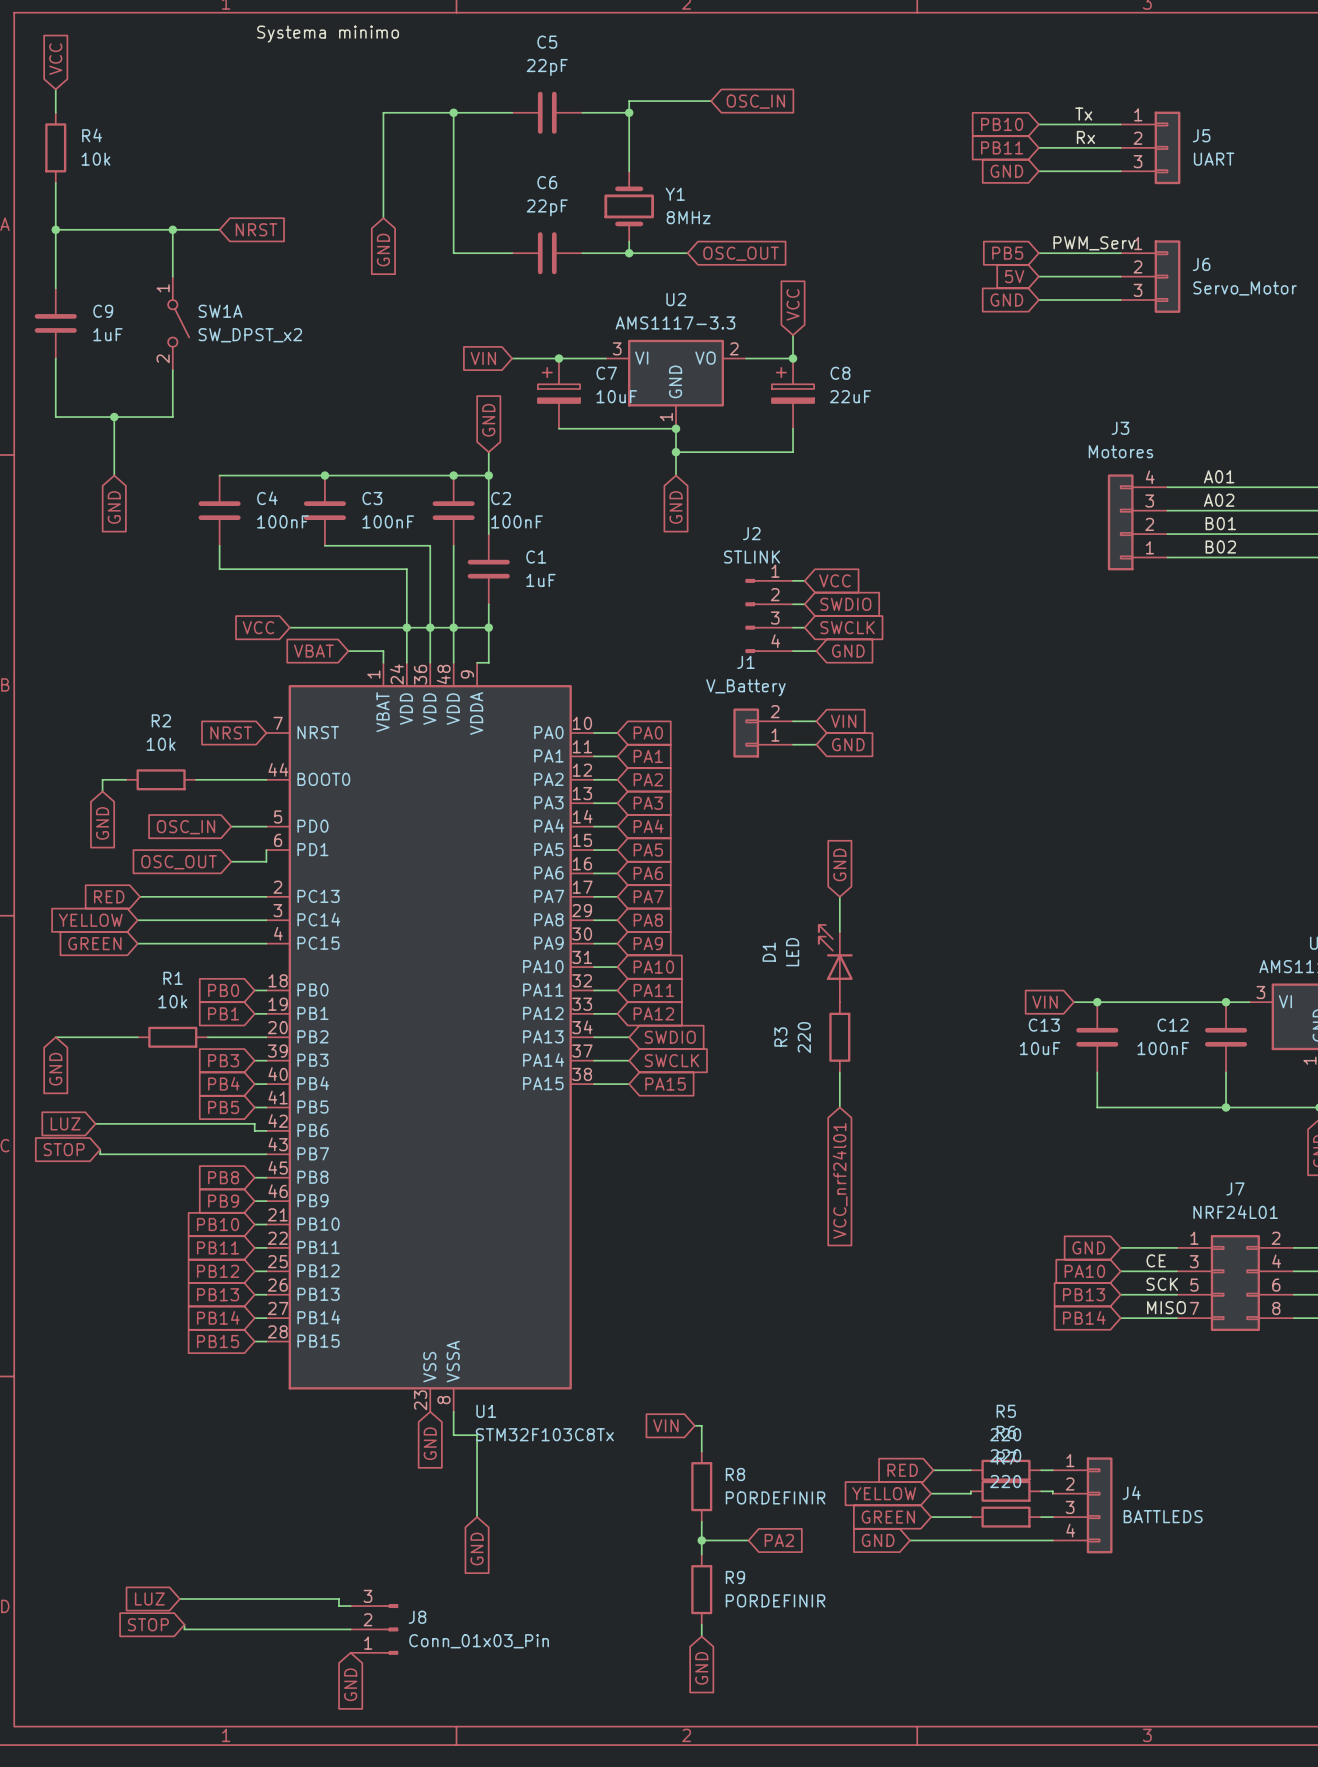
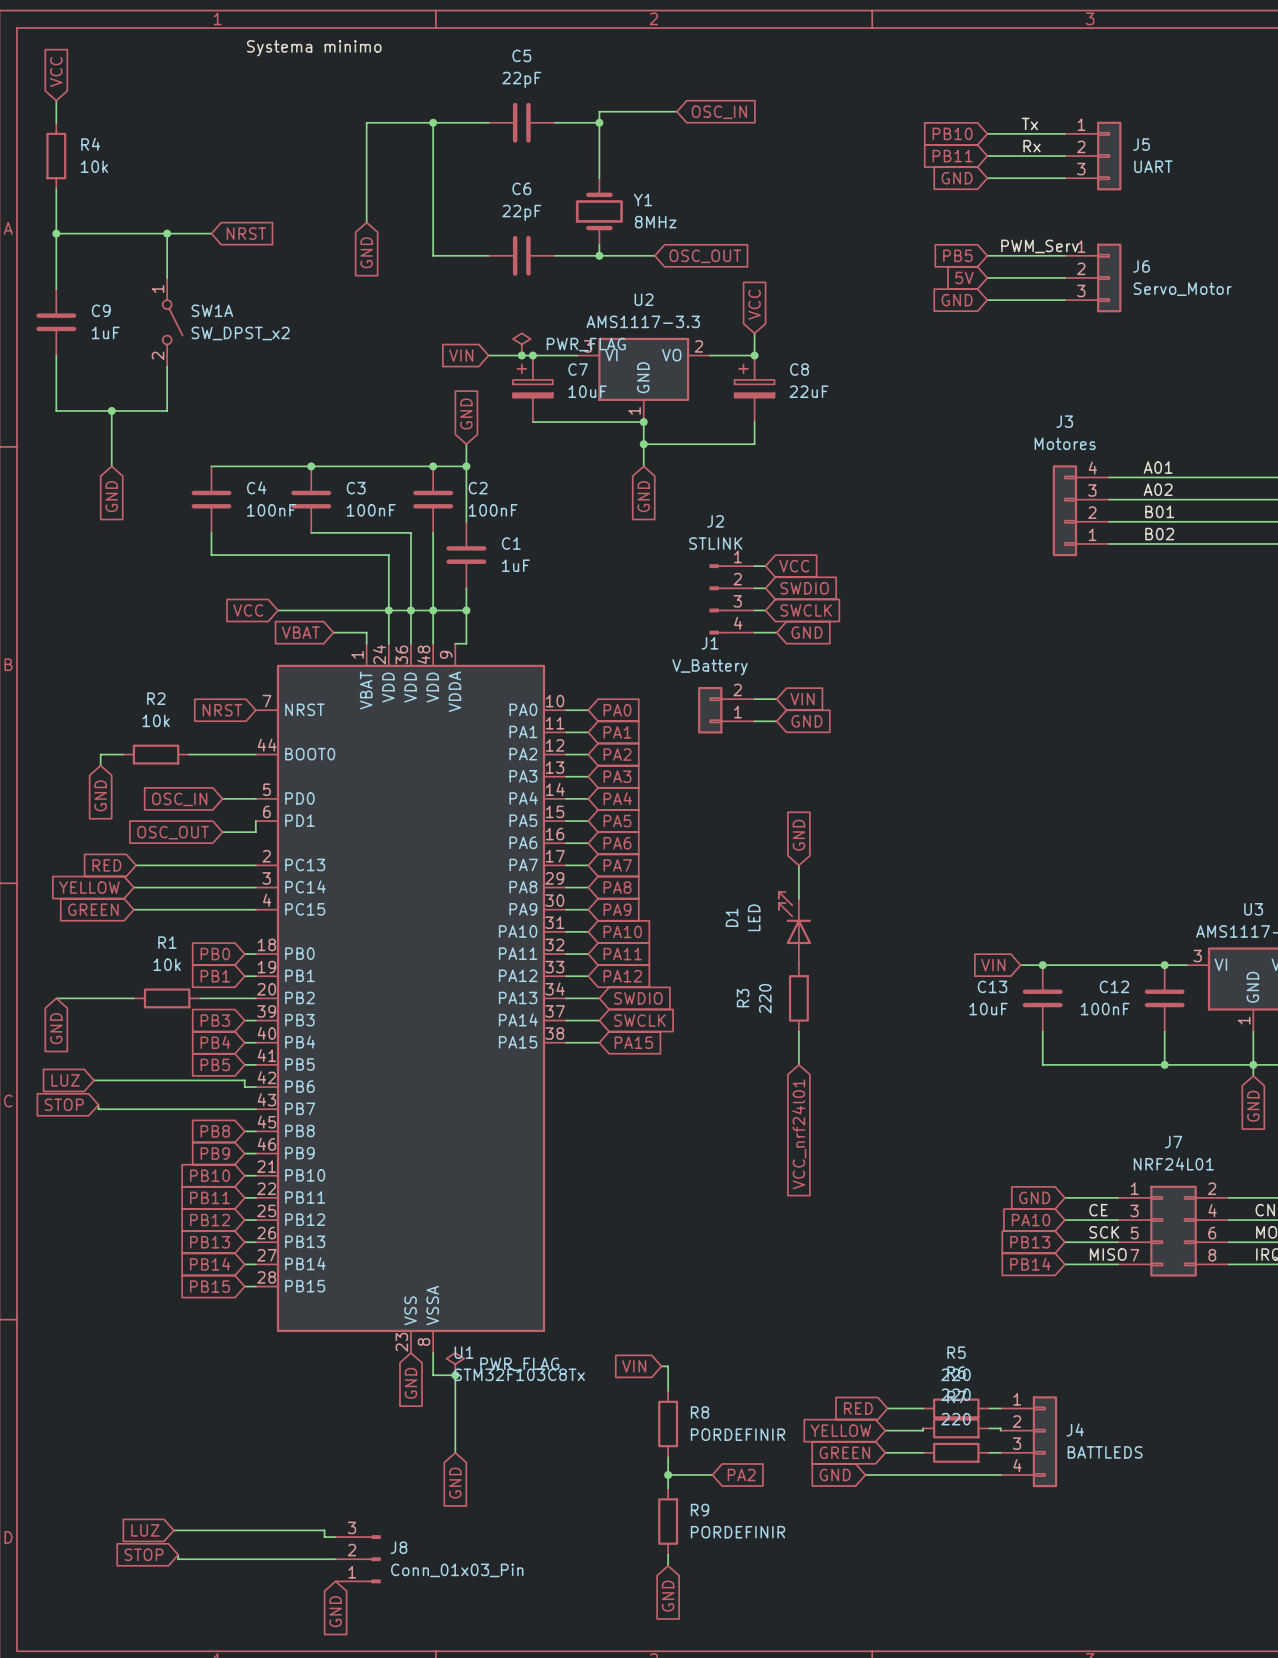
power symbol: none -> PWR_FLAG (521, 344)
junction: none -> (521, 355)
power symbol: none -> PWR_FLAG (455, 1364)
junction: none -> (455, 1375)

